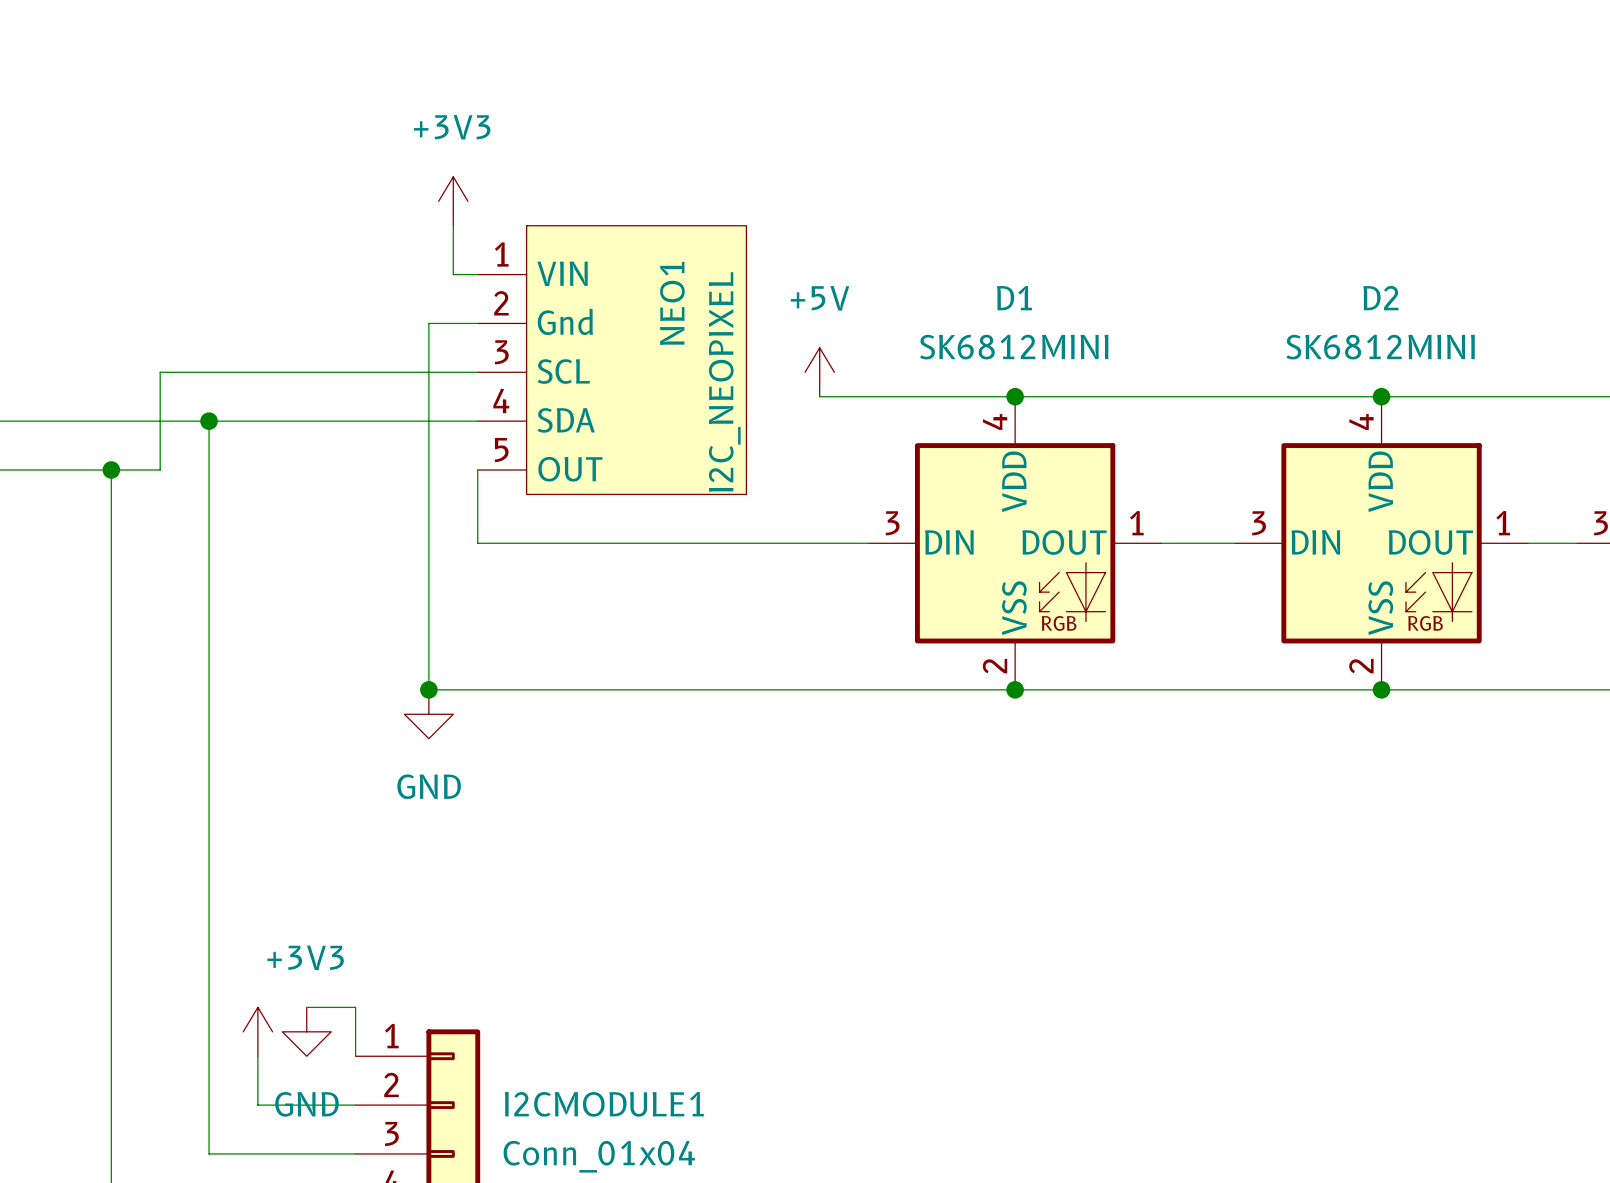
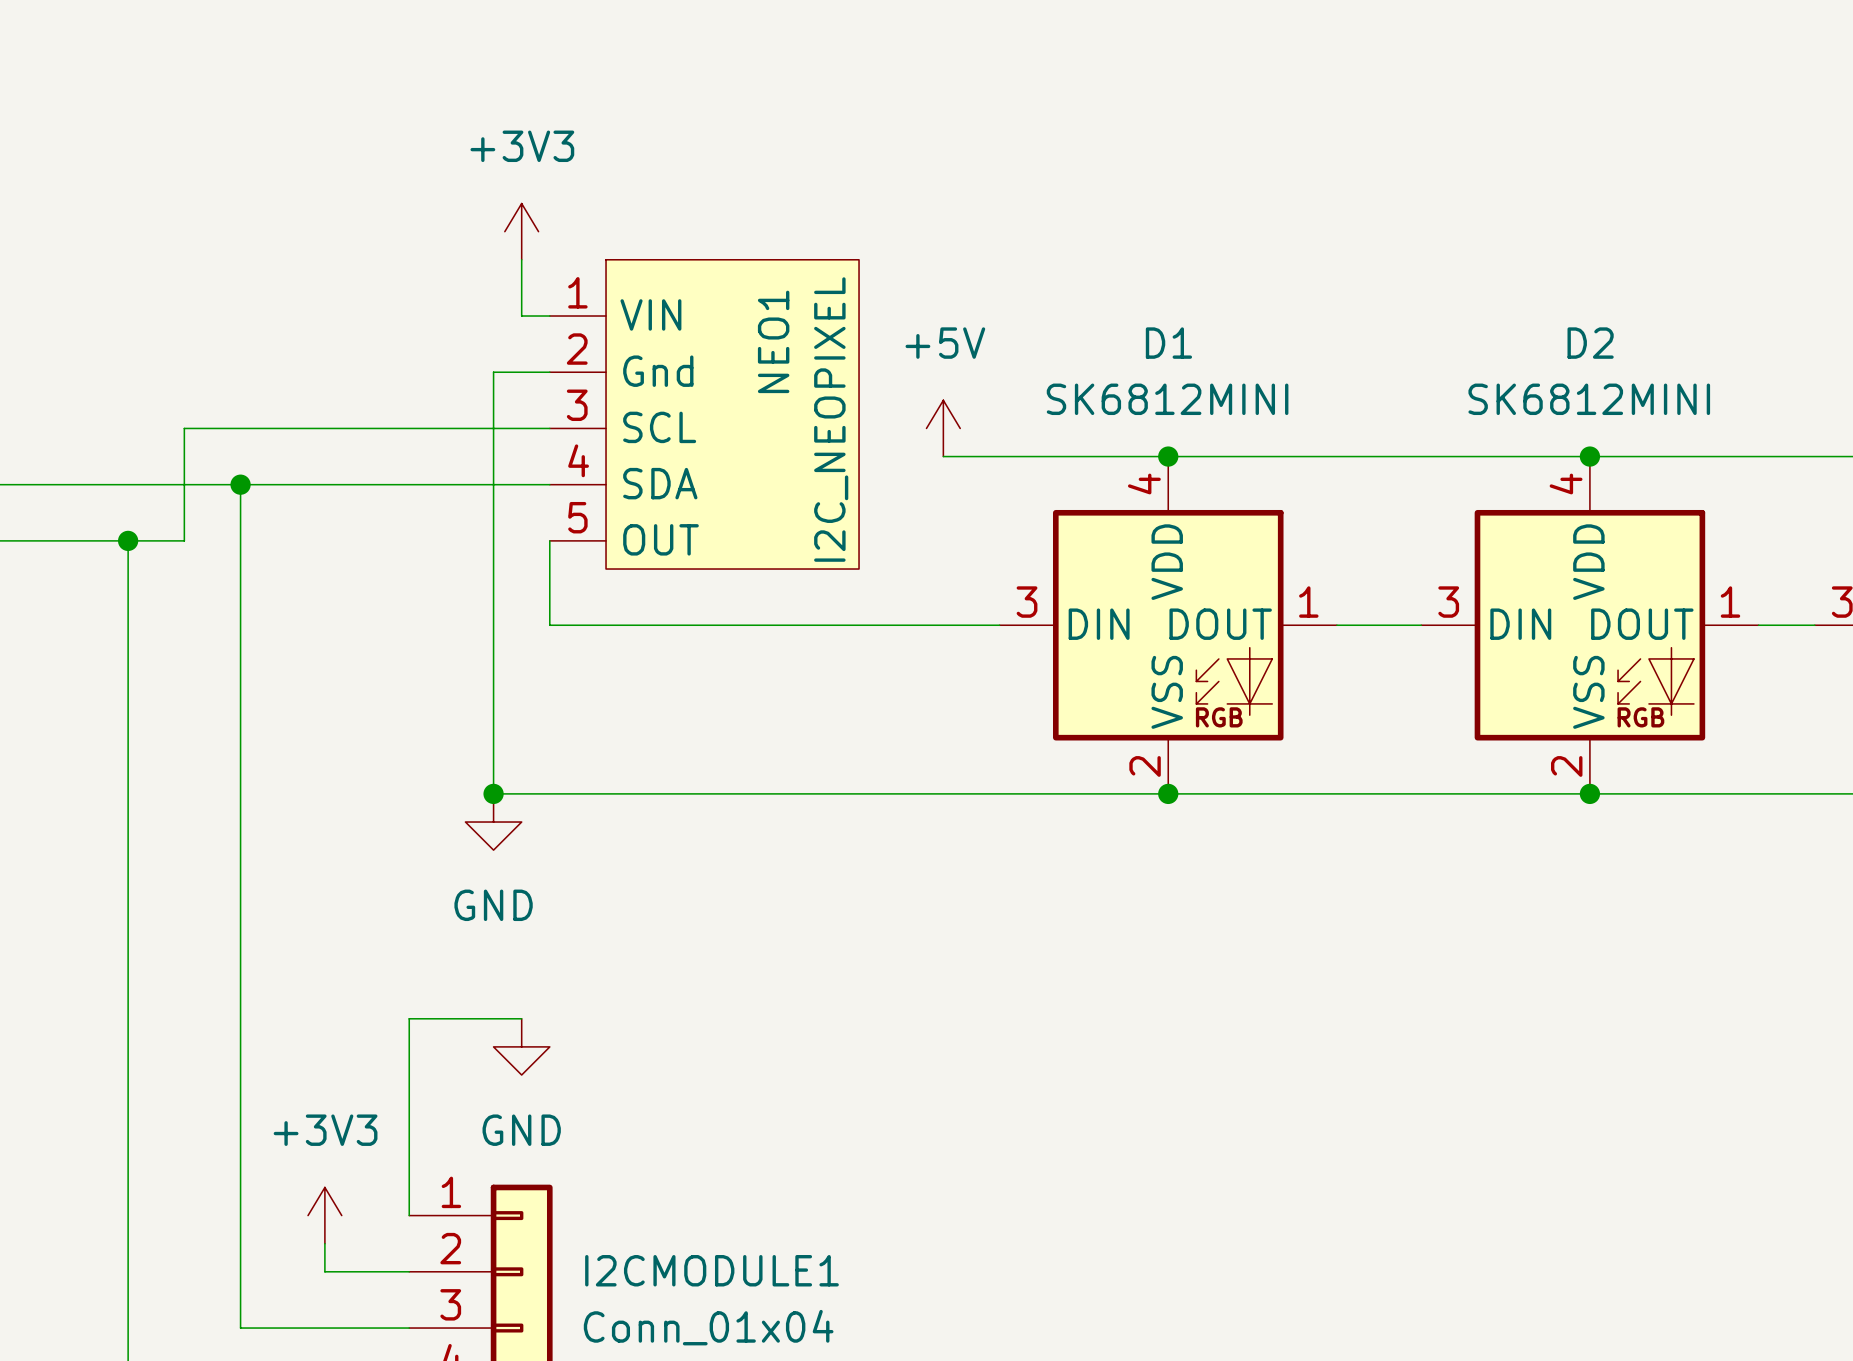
power symbol text position: +3V3 (305, 957) -> +3V3 (325, 1130)
wire: (306, 1007) (355, 1007) -> (521, 1018) (409, 1018) (409, 1159)
power symbol position: +3V3 (257, 1031) -> +3V3 (324, 1215)
power symbol position: GND (306, 1031) -> GND (521, 1046)
wire: (257, 1056) (257, 1105) (282, 1105) -> (324, 1243) (324, 1271)

